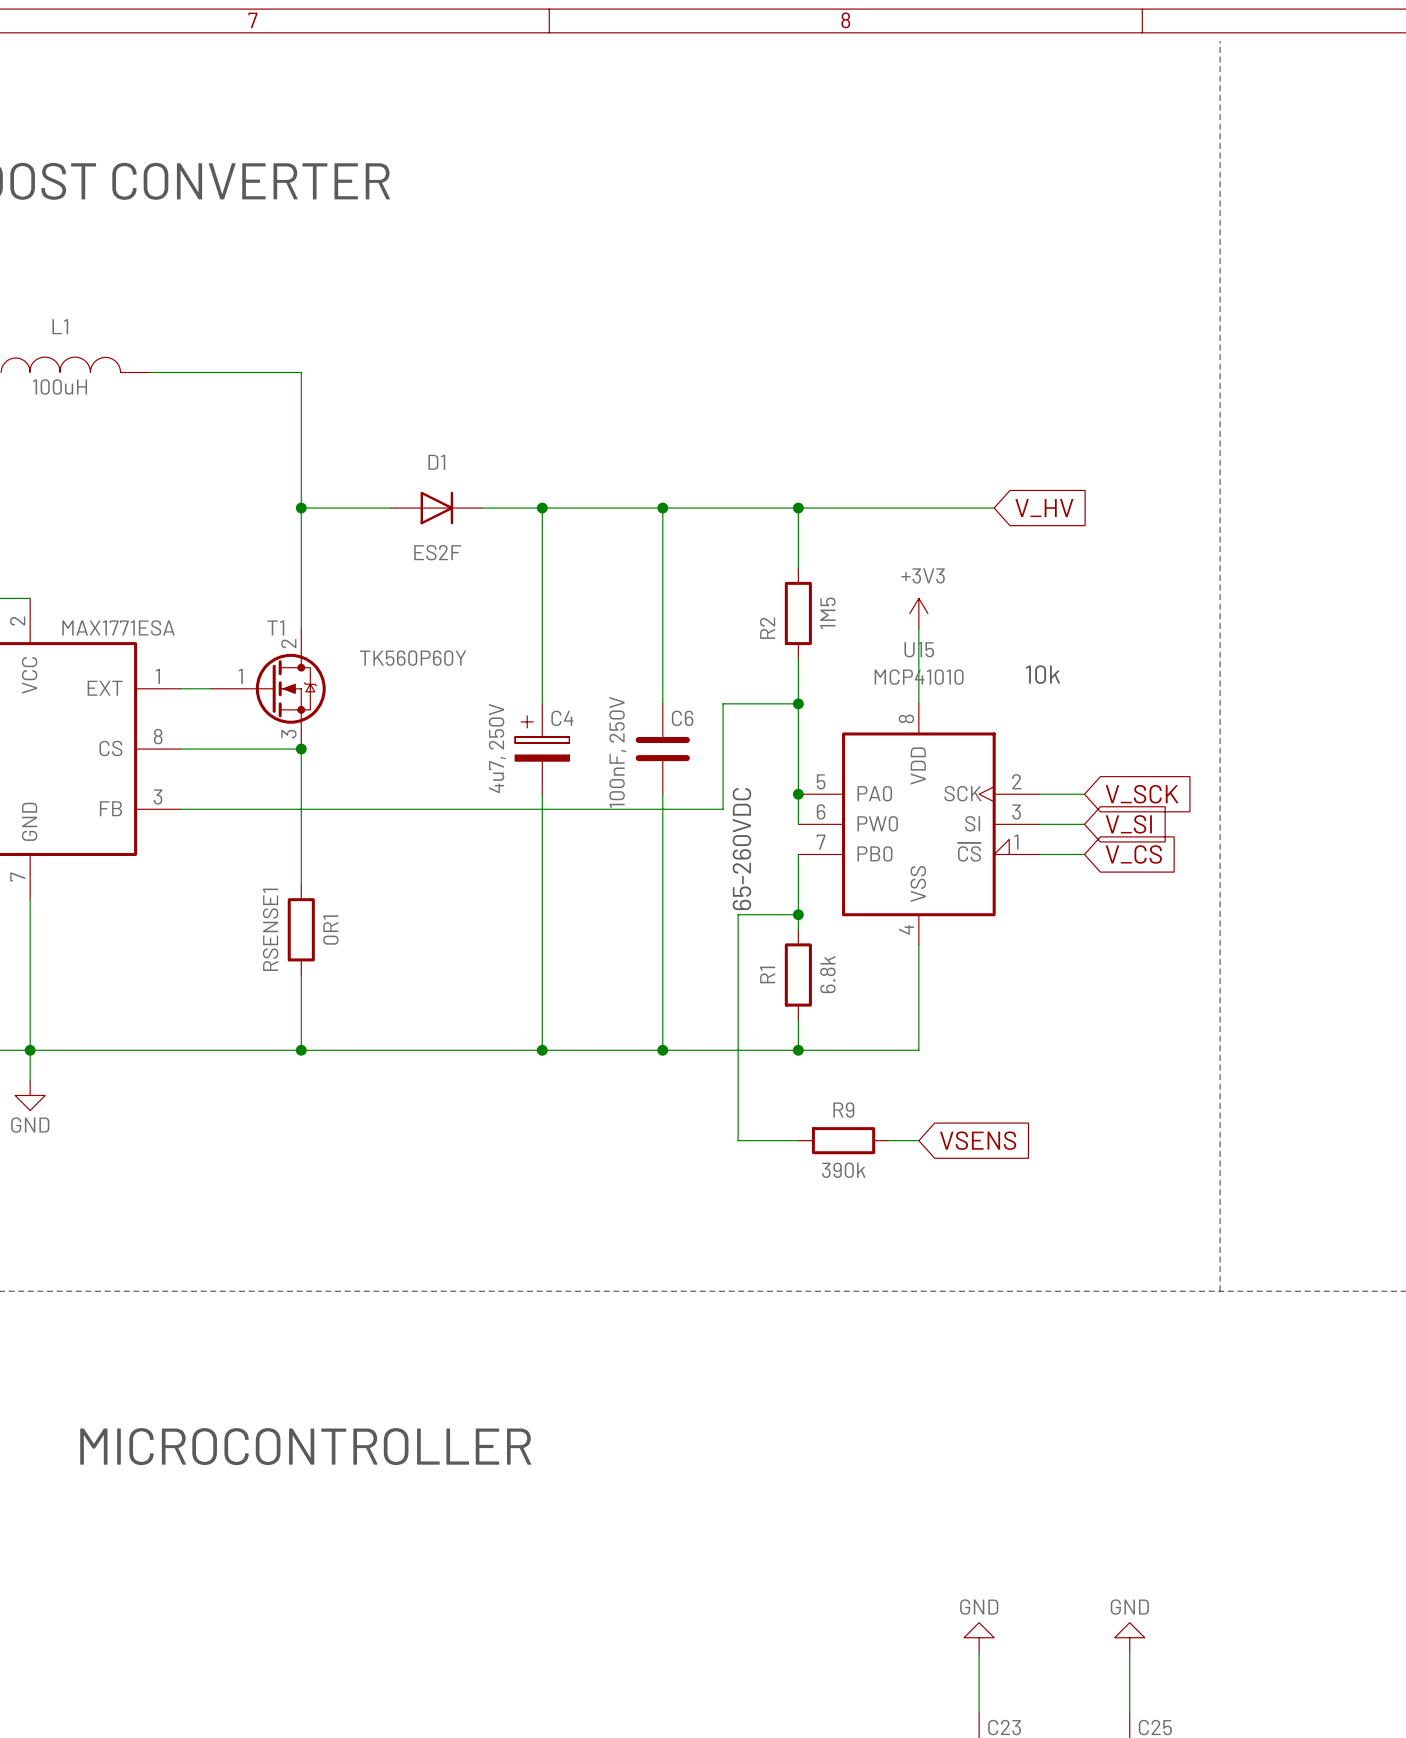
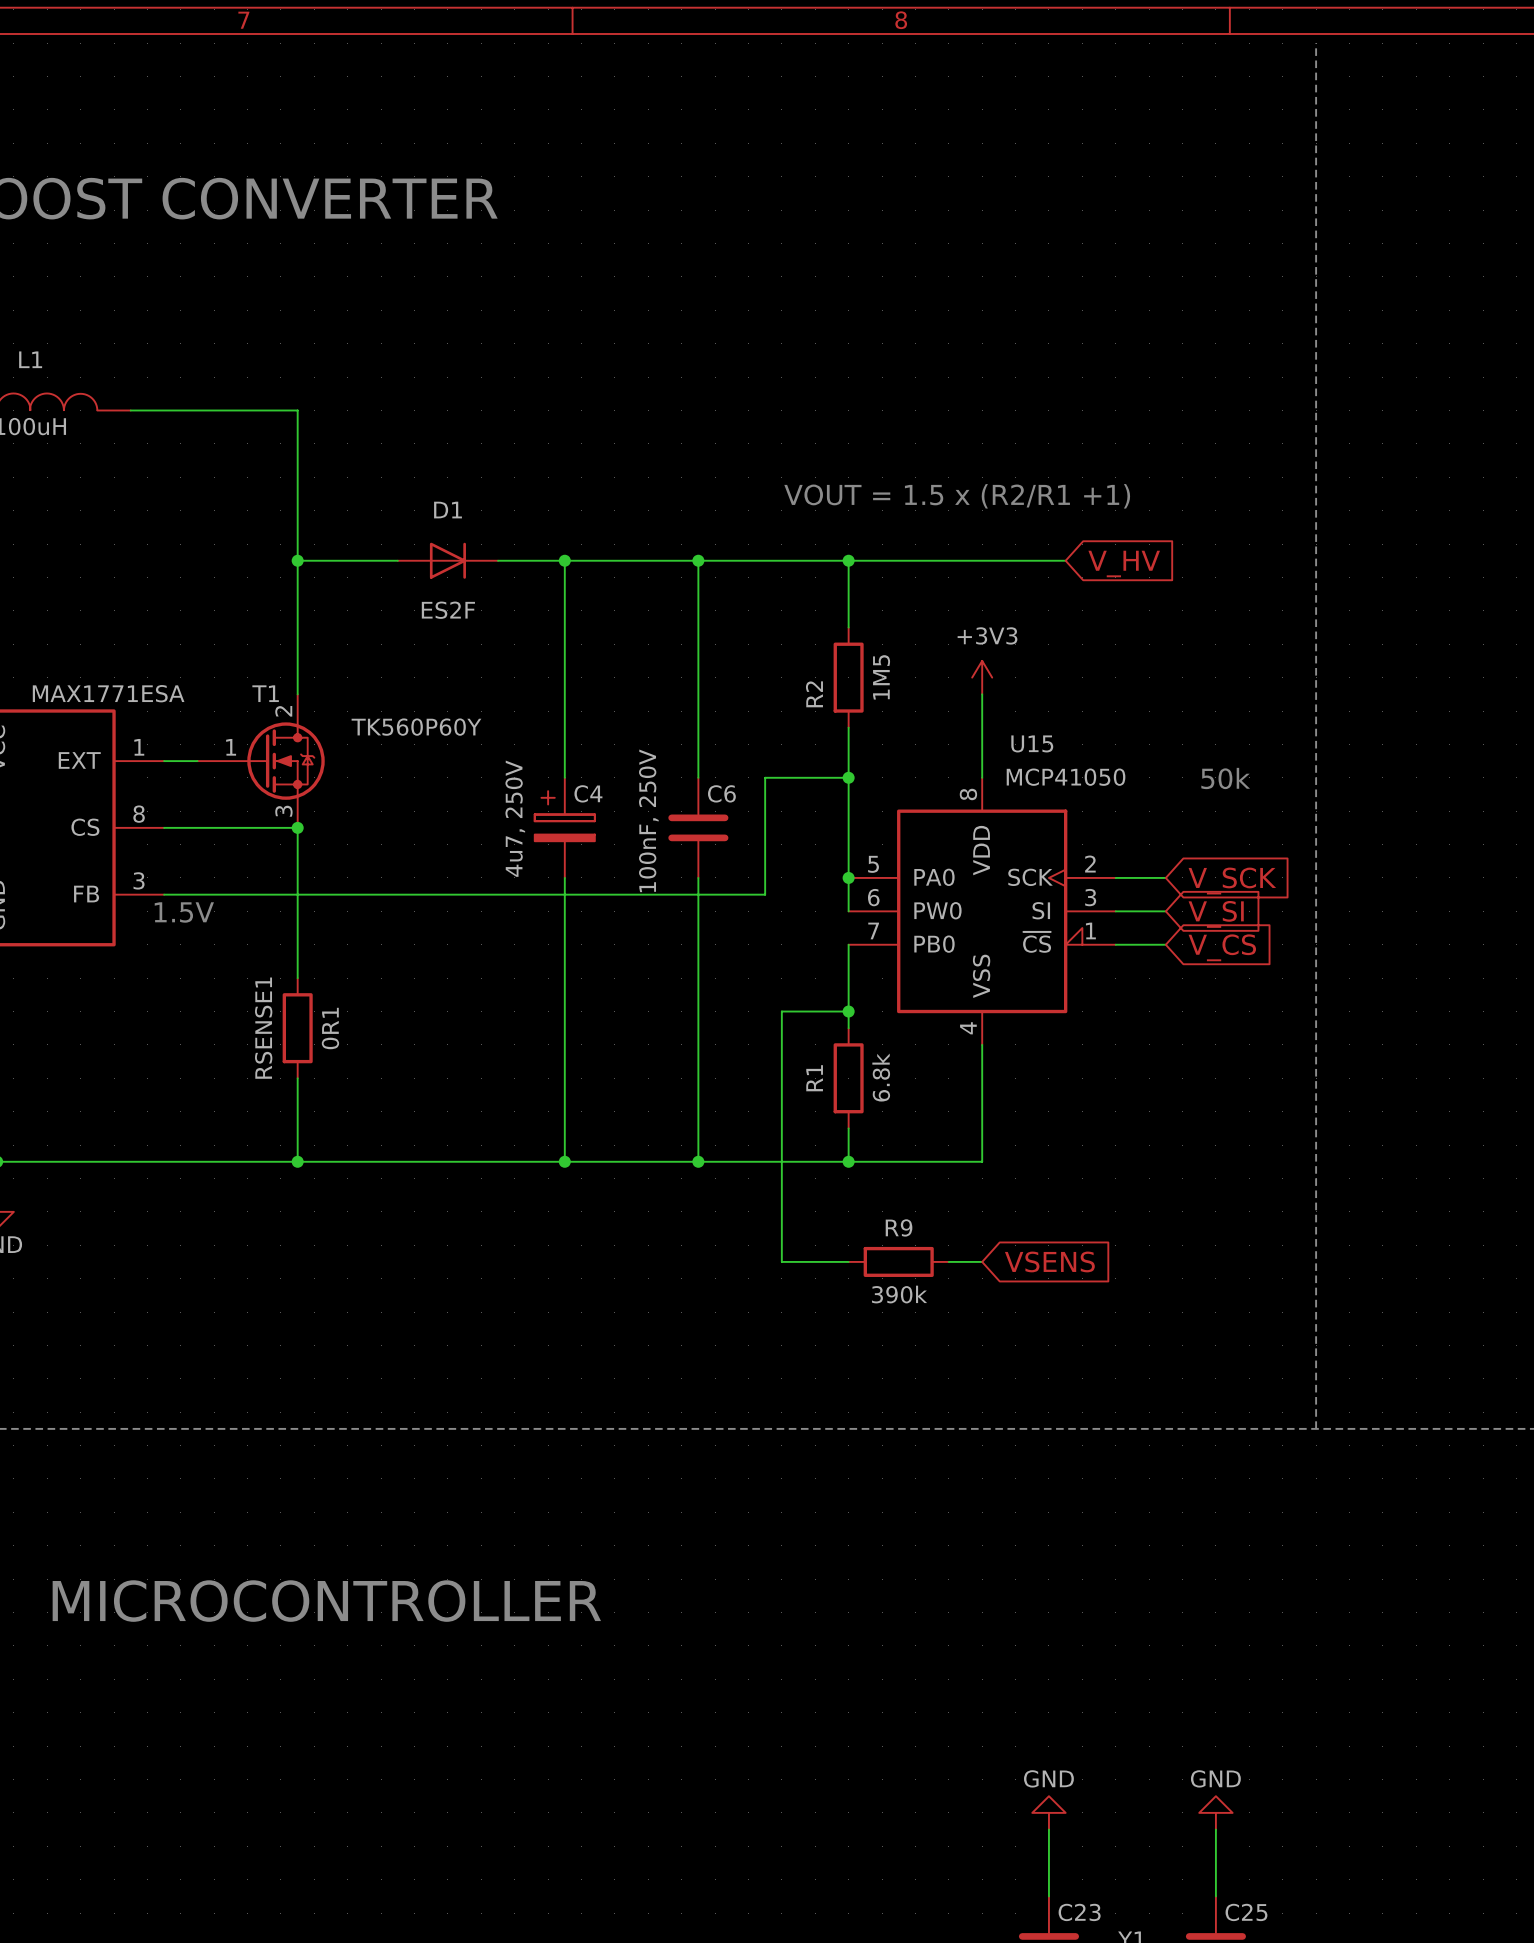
text: none -> VOUT = 1.5 x (R2/R1 +1) (957, 496)
U15 name position: U15 (919, 649) -> U15 (1032, 743)
text: 10k (1042, 674) -> none
U15 value: MCP41010 (919, 677) -> MCP41050 (1066, 777)
text: none -> 50k (1225, 778)
text: none -> 1.5V (184, 912)
text: 65-260VDC (741, 849) -> none

